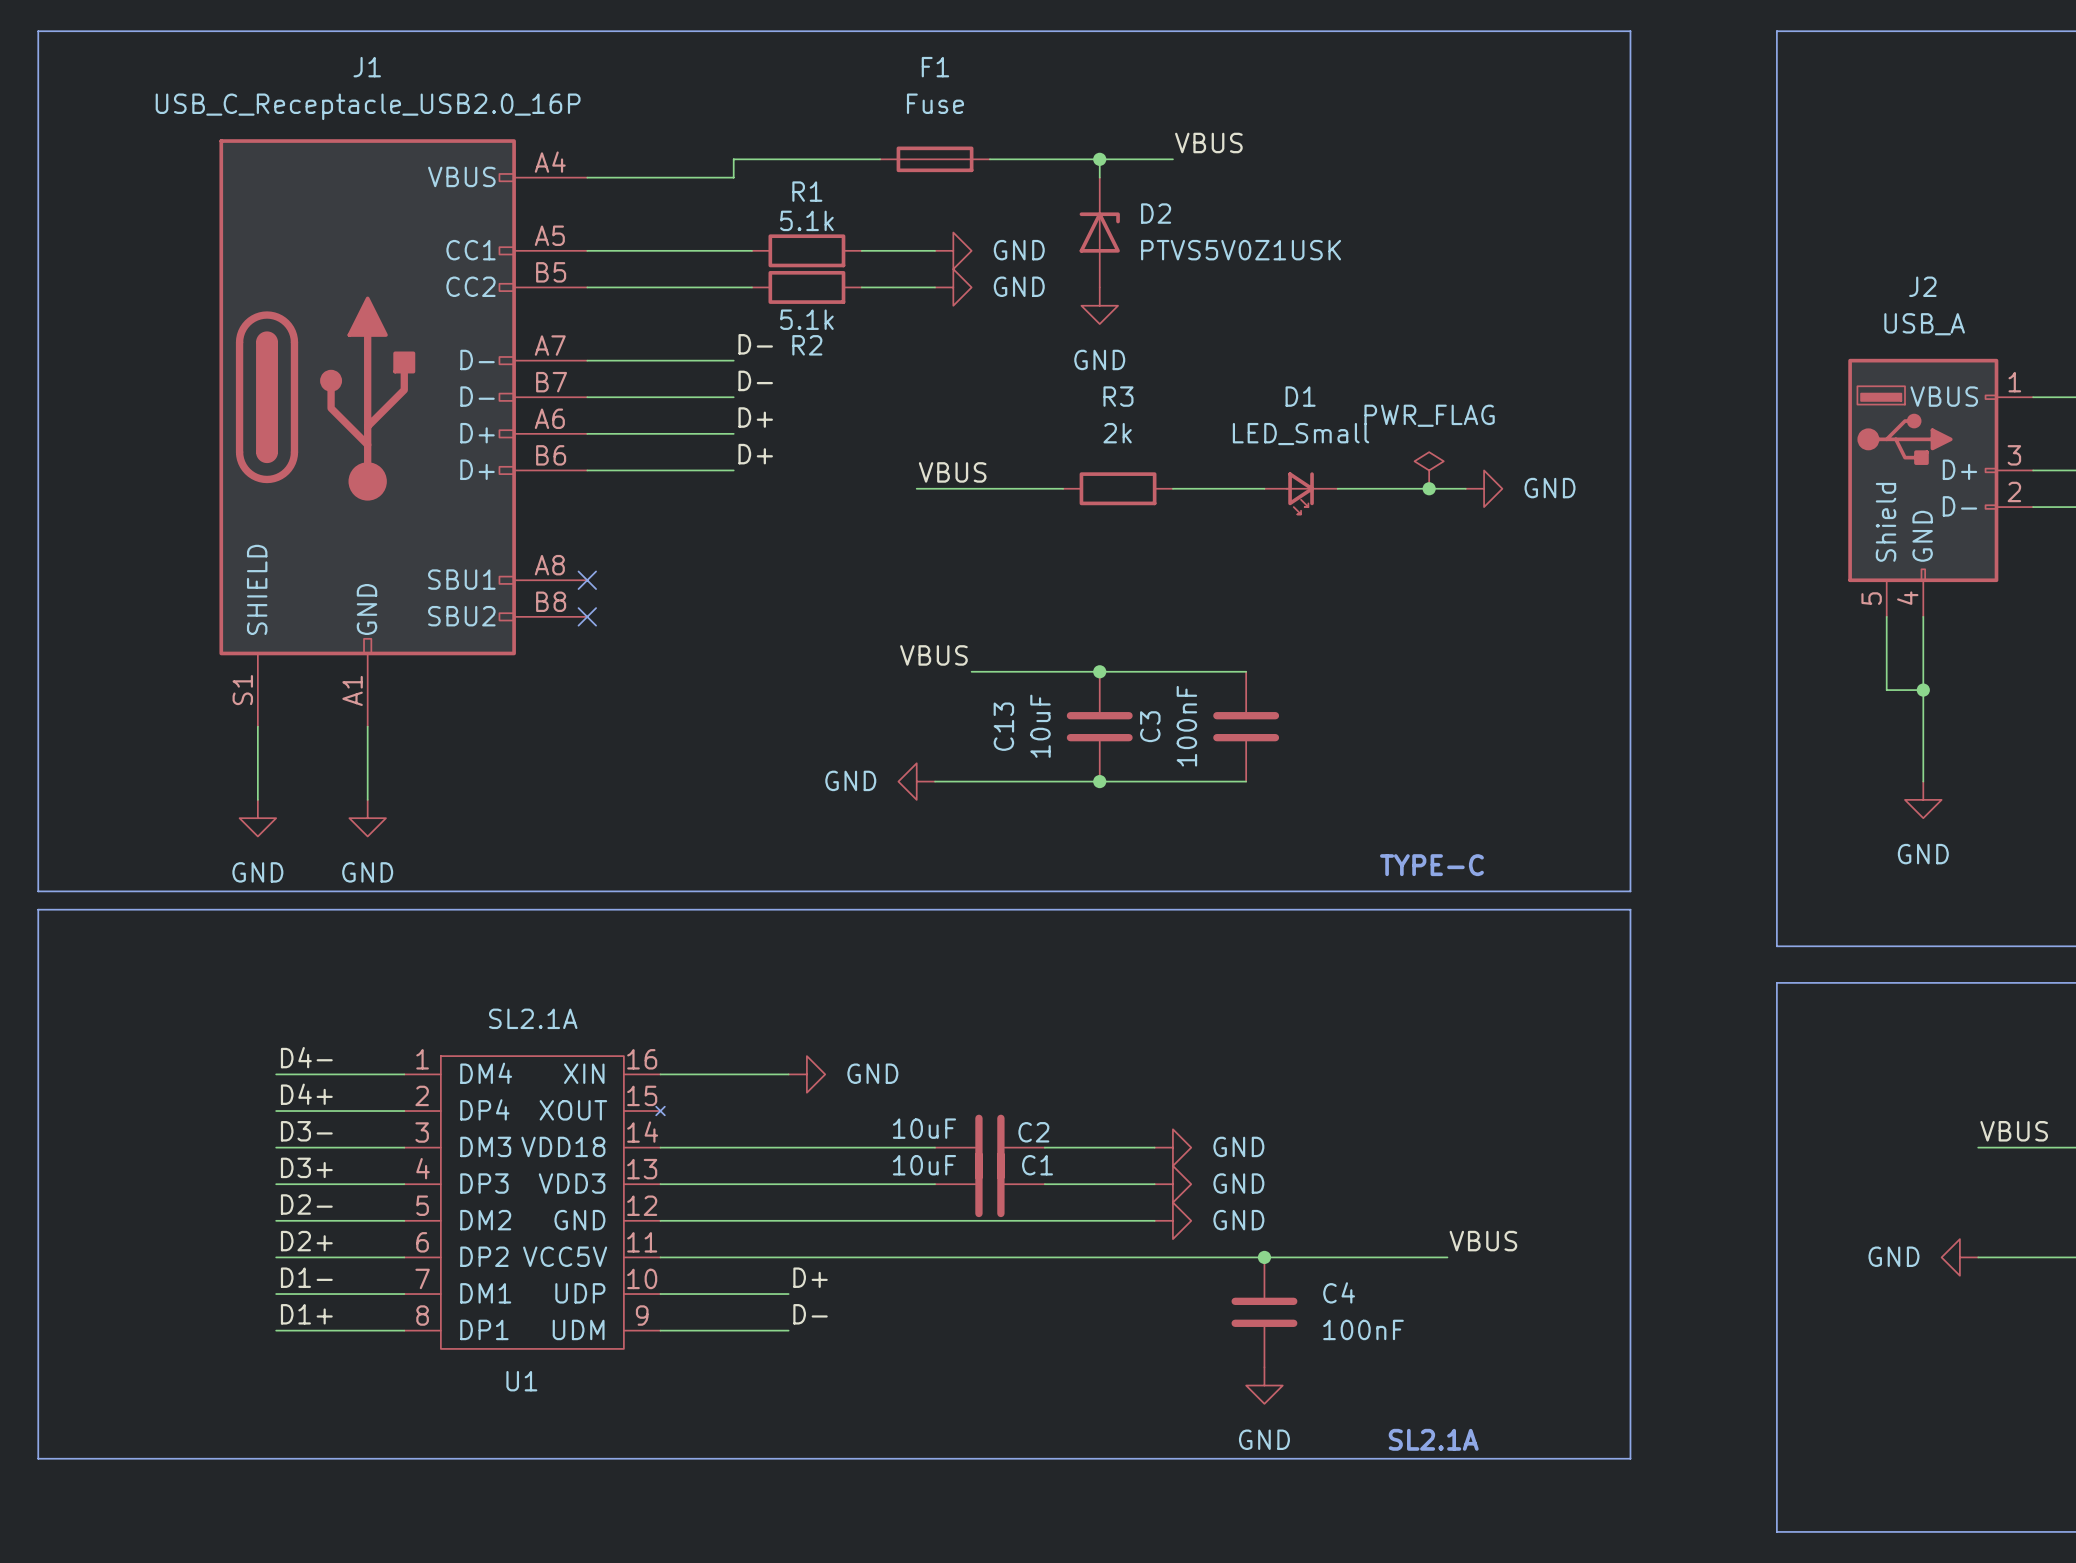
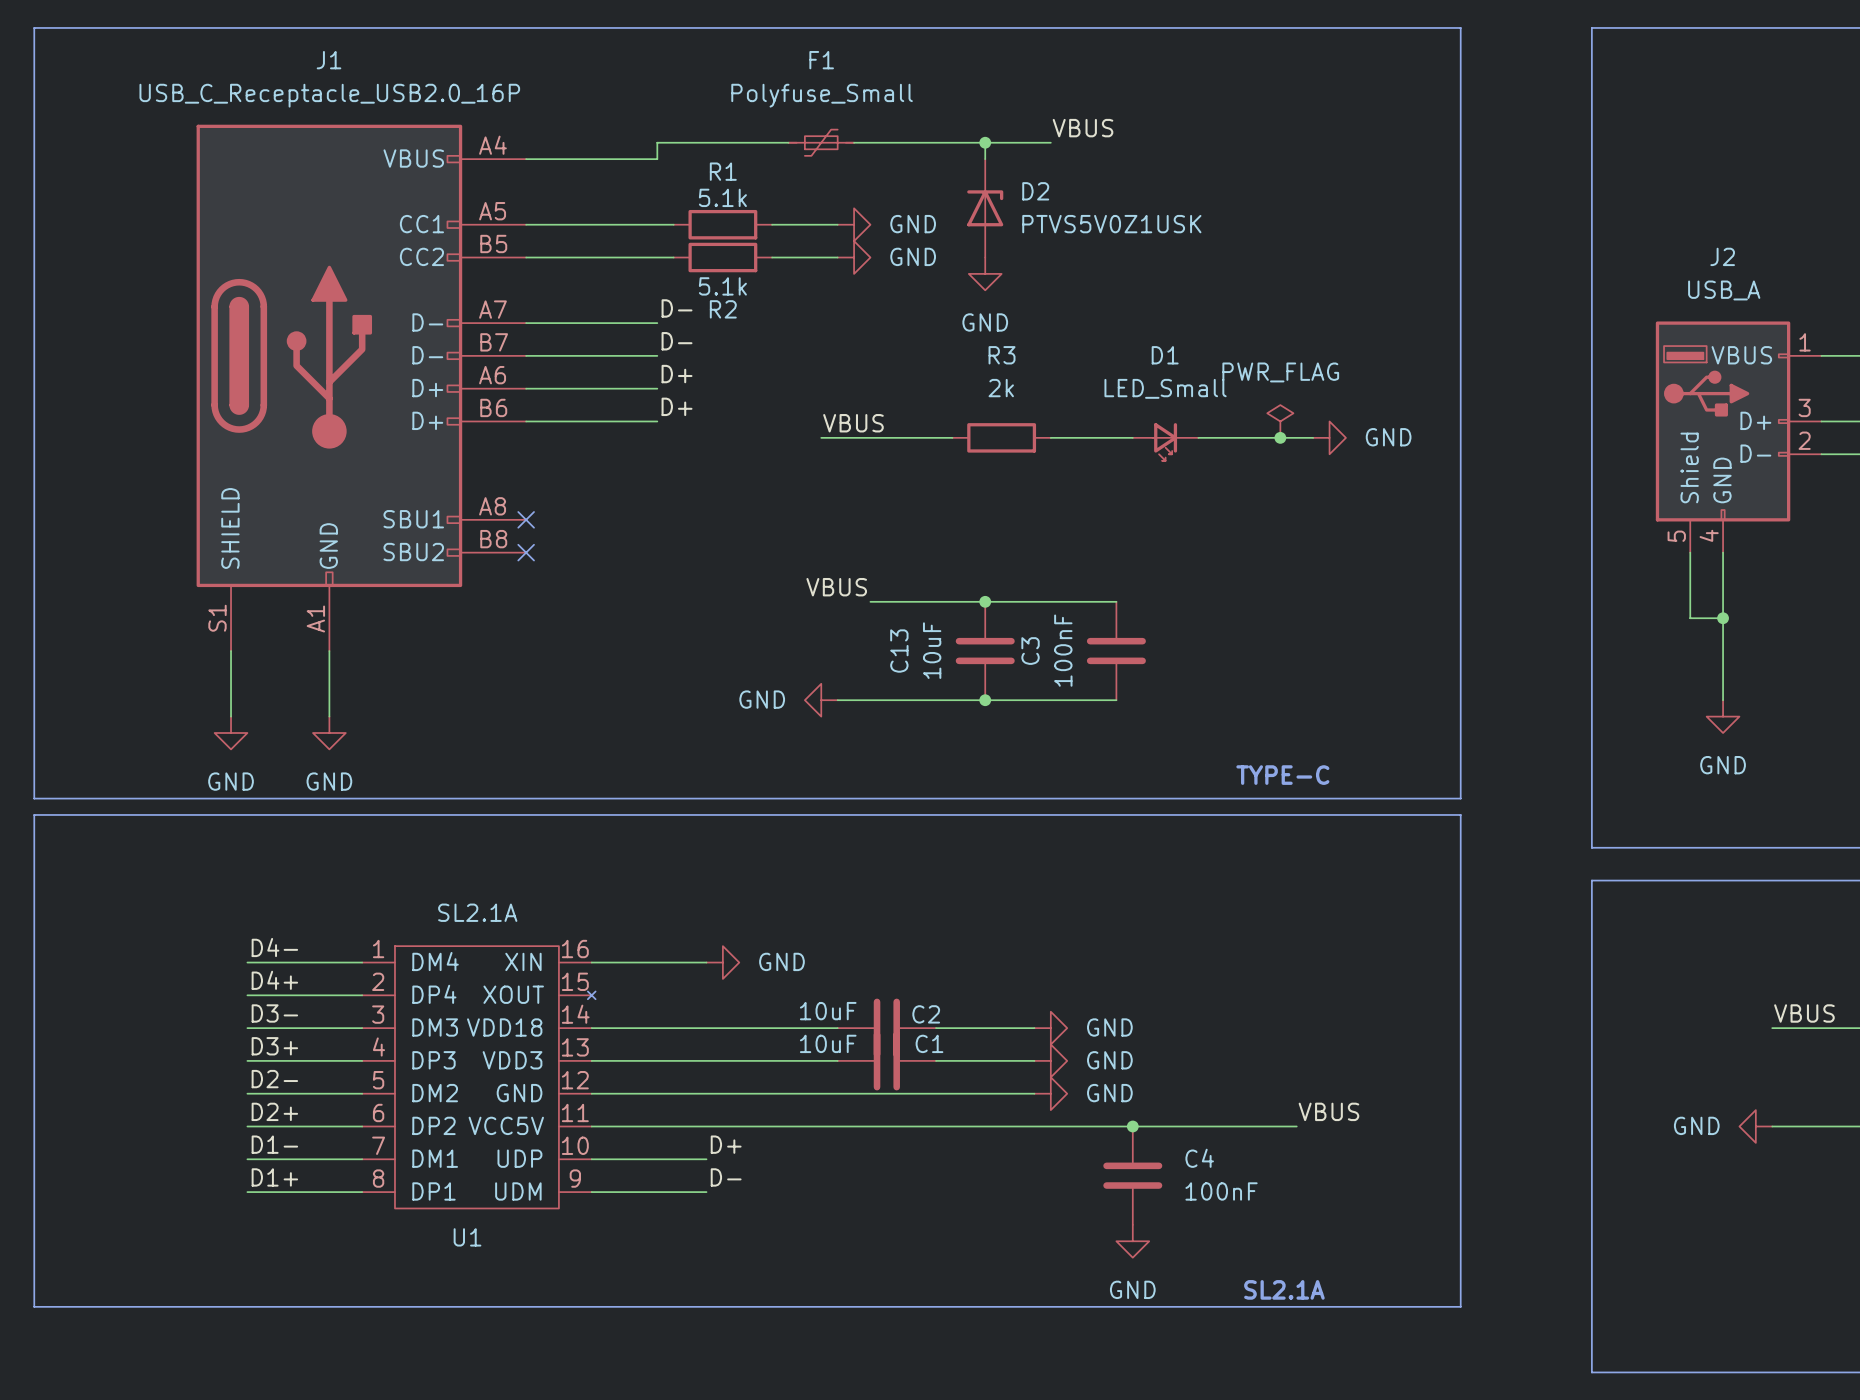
F1 value: Fuse (935, 103) -> Polyfuse_Small (822, 95)
F1 symbol: [880, 146, 990, 173] -> [788, 129, 855, 156]

